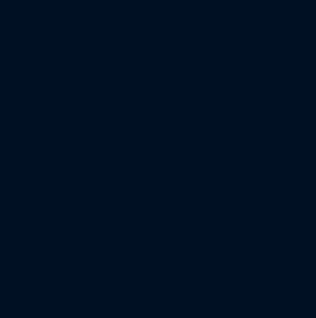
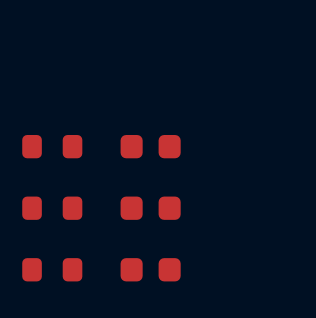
part: none -> (52, 146)
part: none -> (150, 146)
part: none -> (52, 208)
part: none -> (150, 208)
part: none -> (52, 269)
part: none -> (150, 269)

